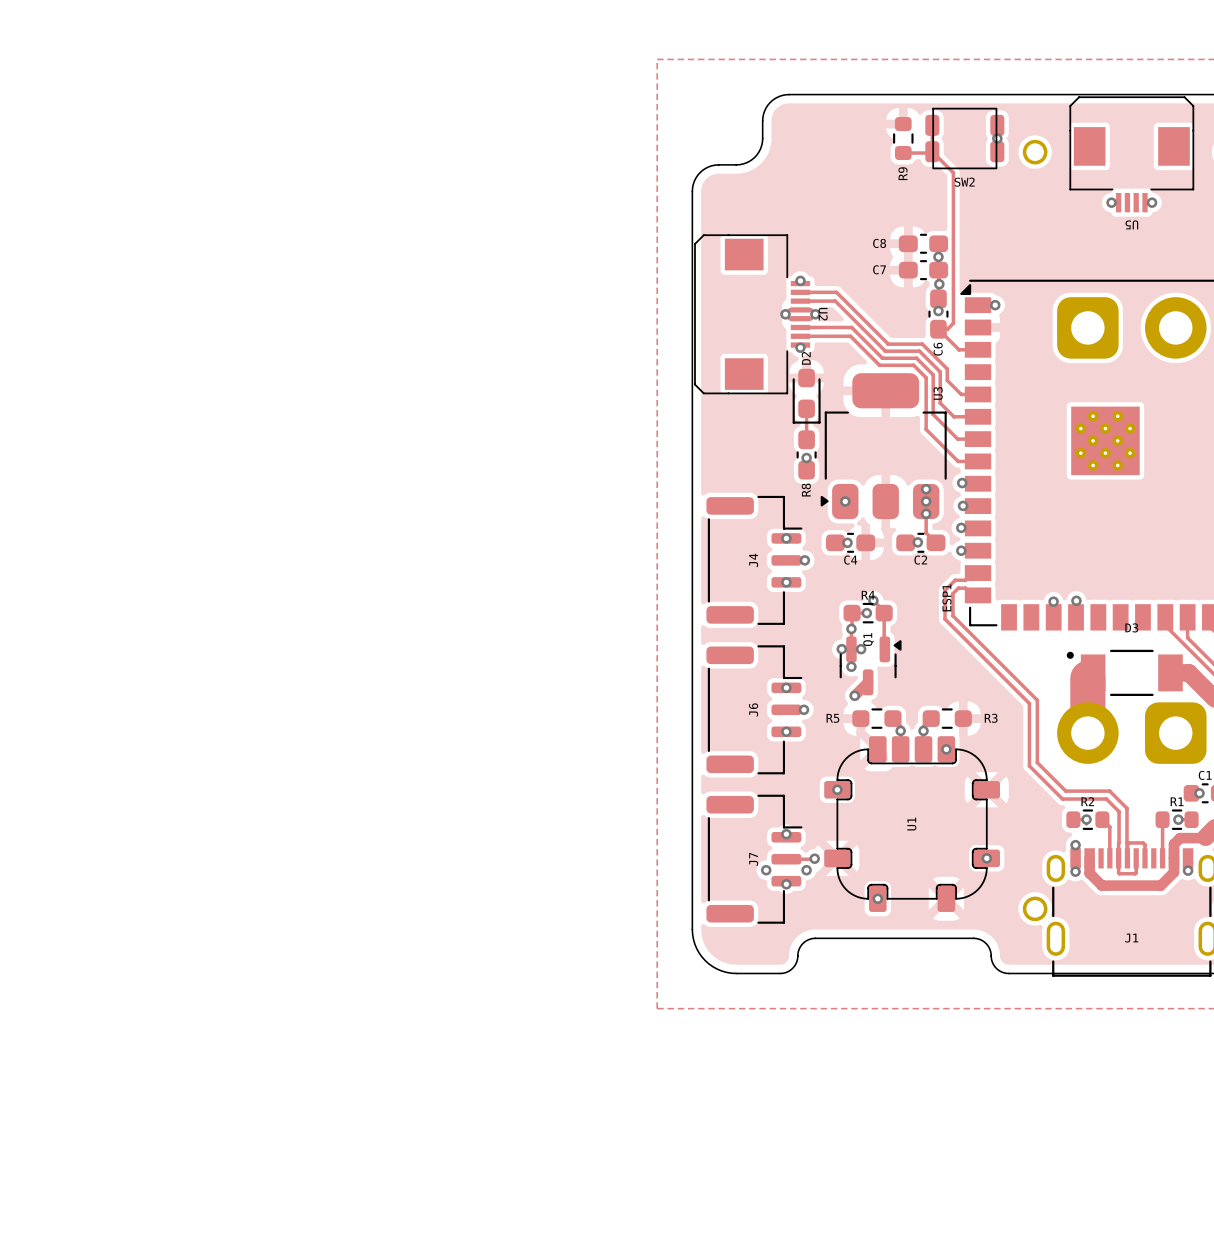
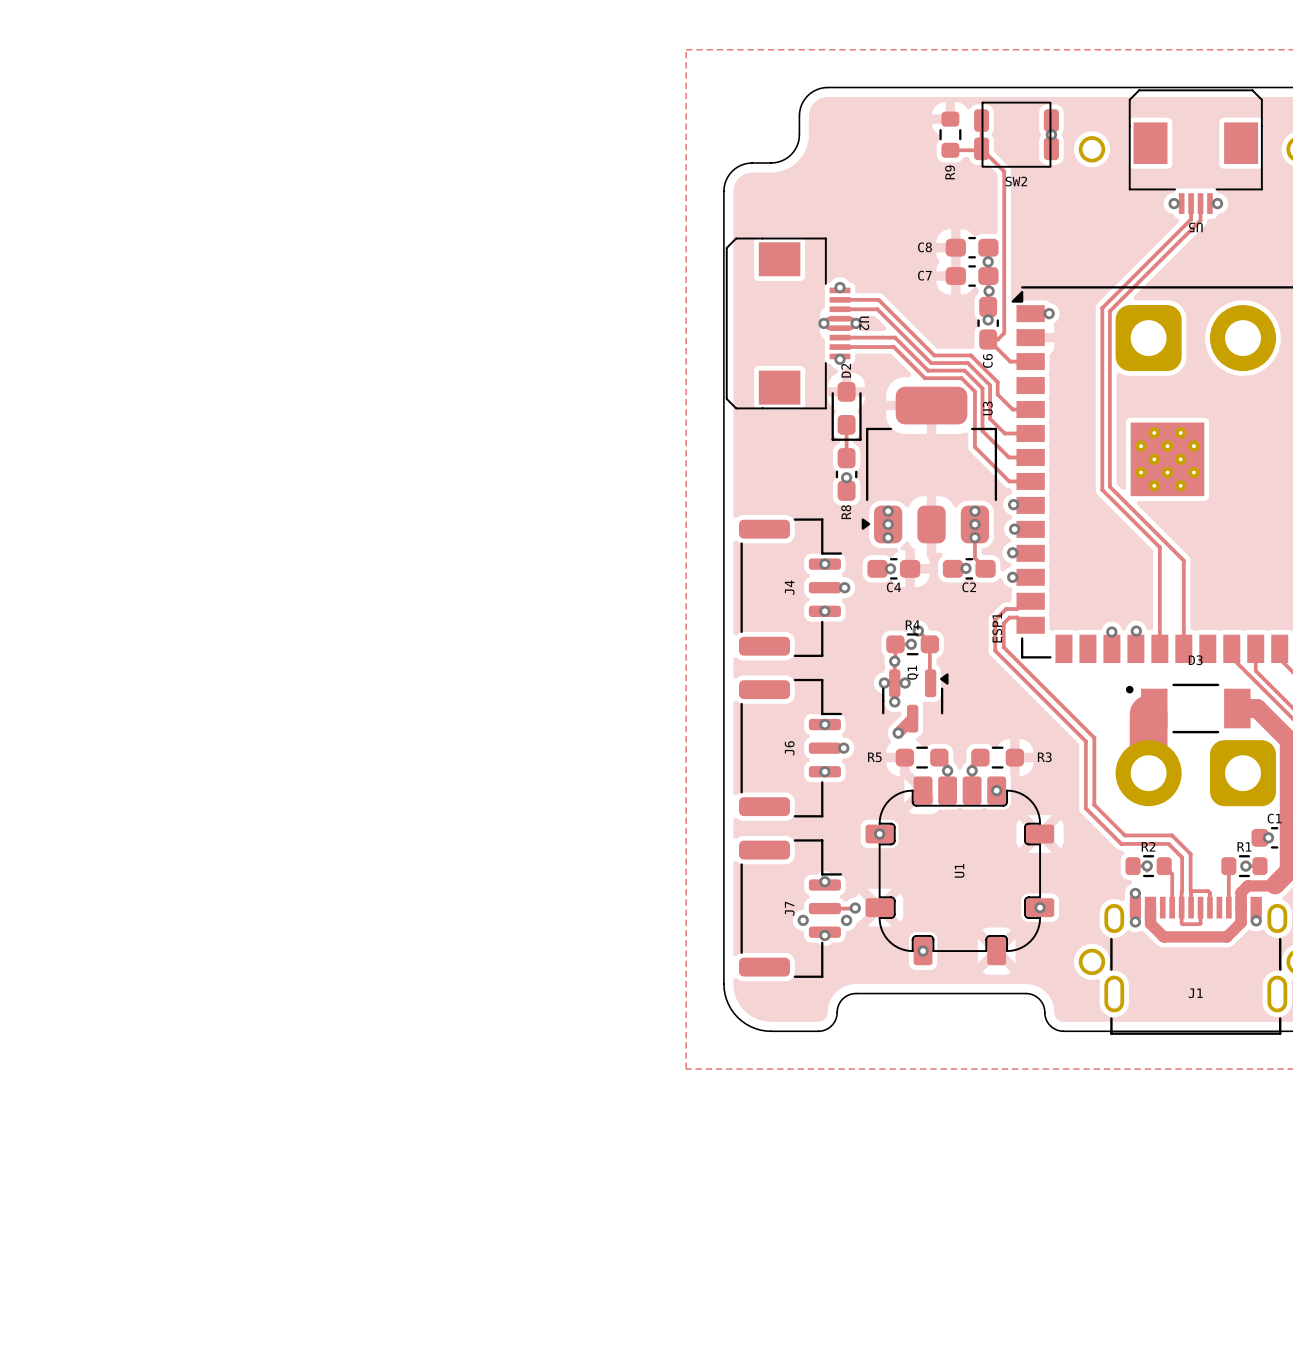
track: none -> (1191, 203) (1191, 219) (1102, 308) (1102, 489) (1159, 547) (1159, 648)
track: none -> (1200, 203) (1200, 220) (1109, 311) (1109, 486) (1183, 560) (1183, 648)
via: none -> (888, 511)
via: none -> (888, 537)

